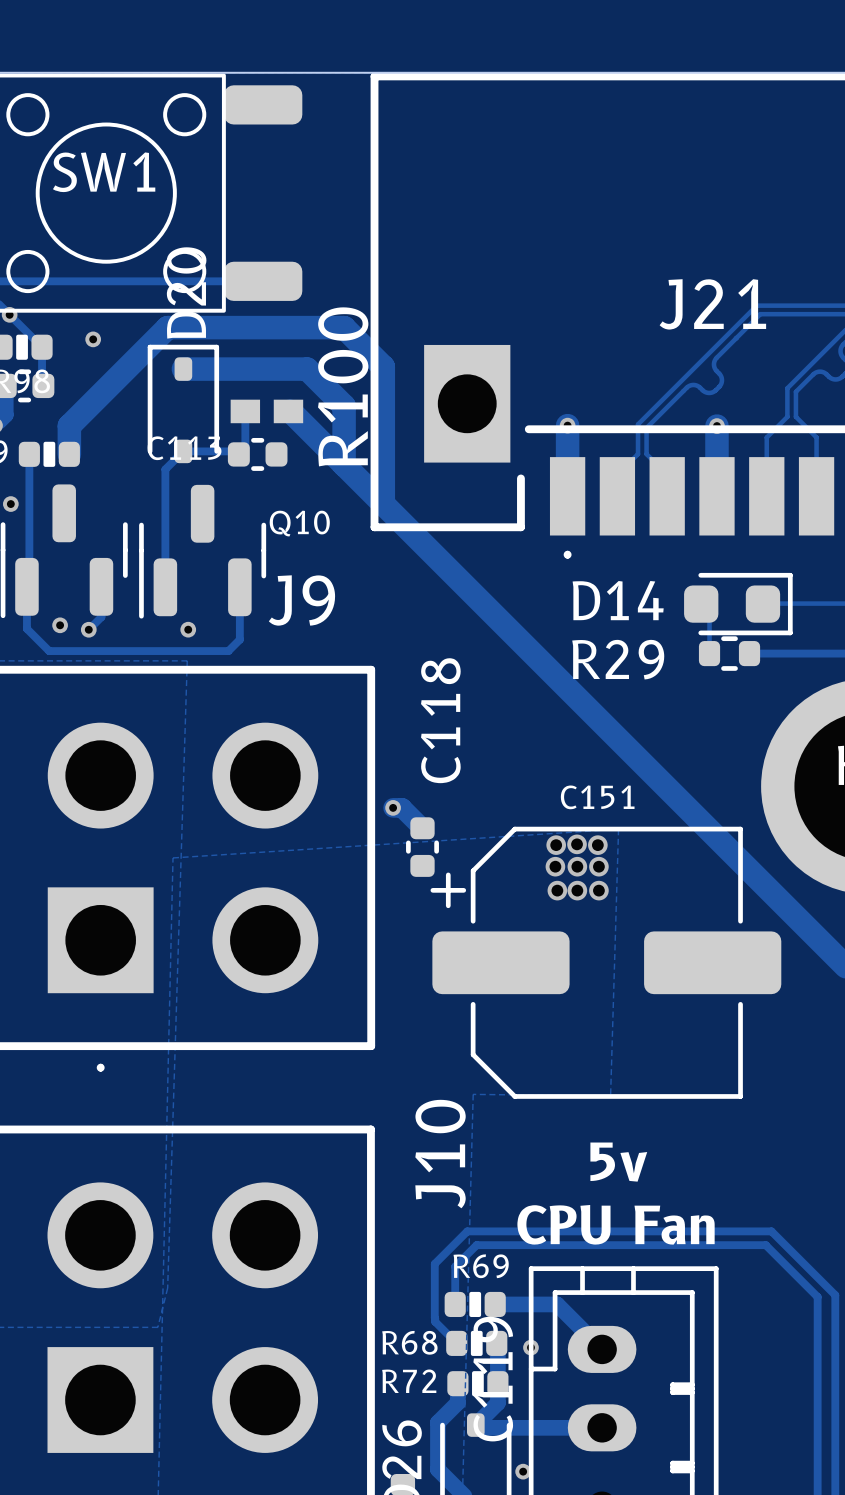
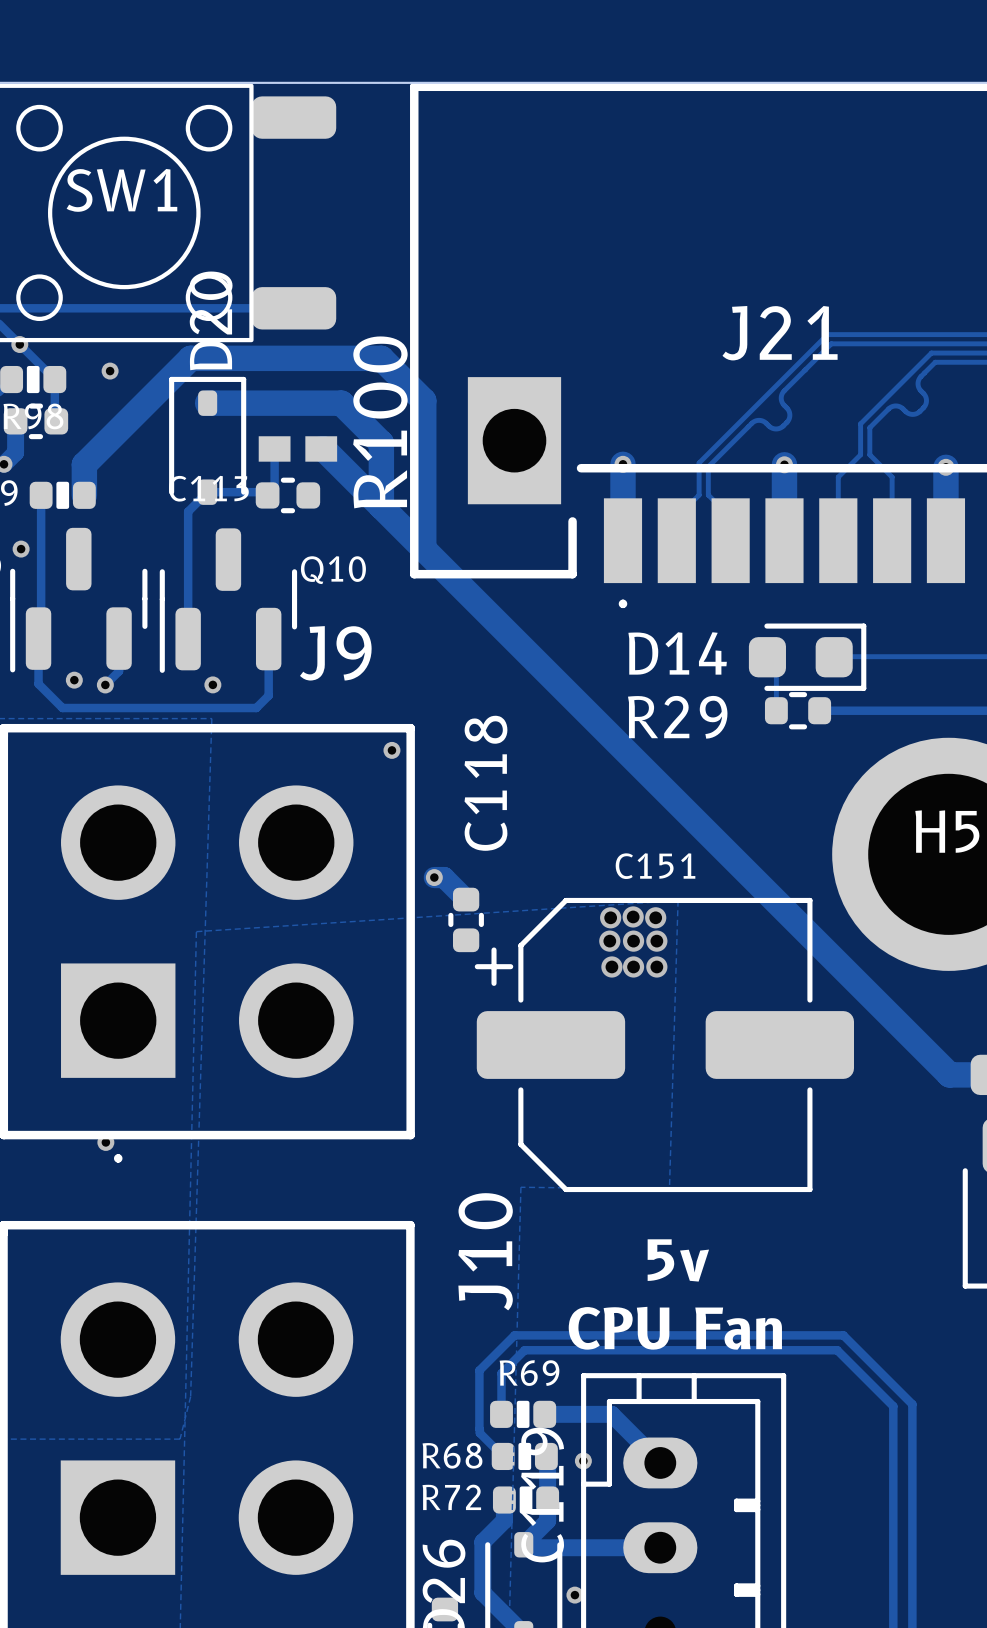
via: none -> (391, 750)
via: none -> (105, 1142)

